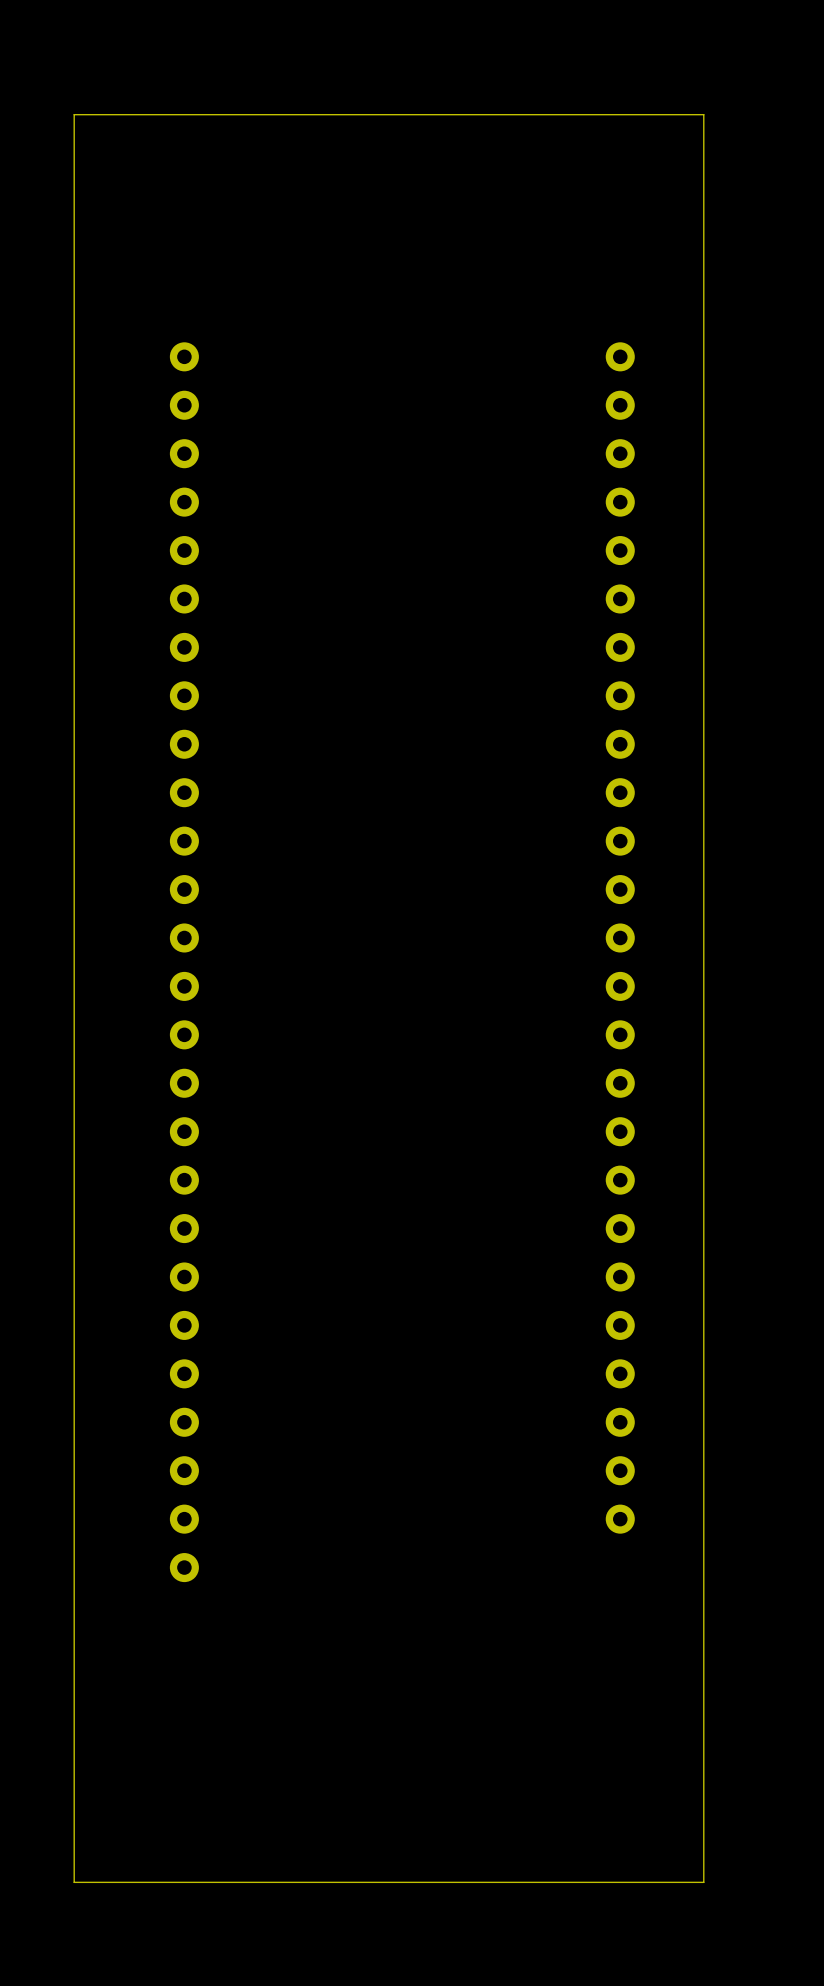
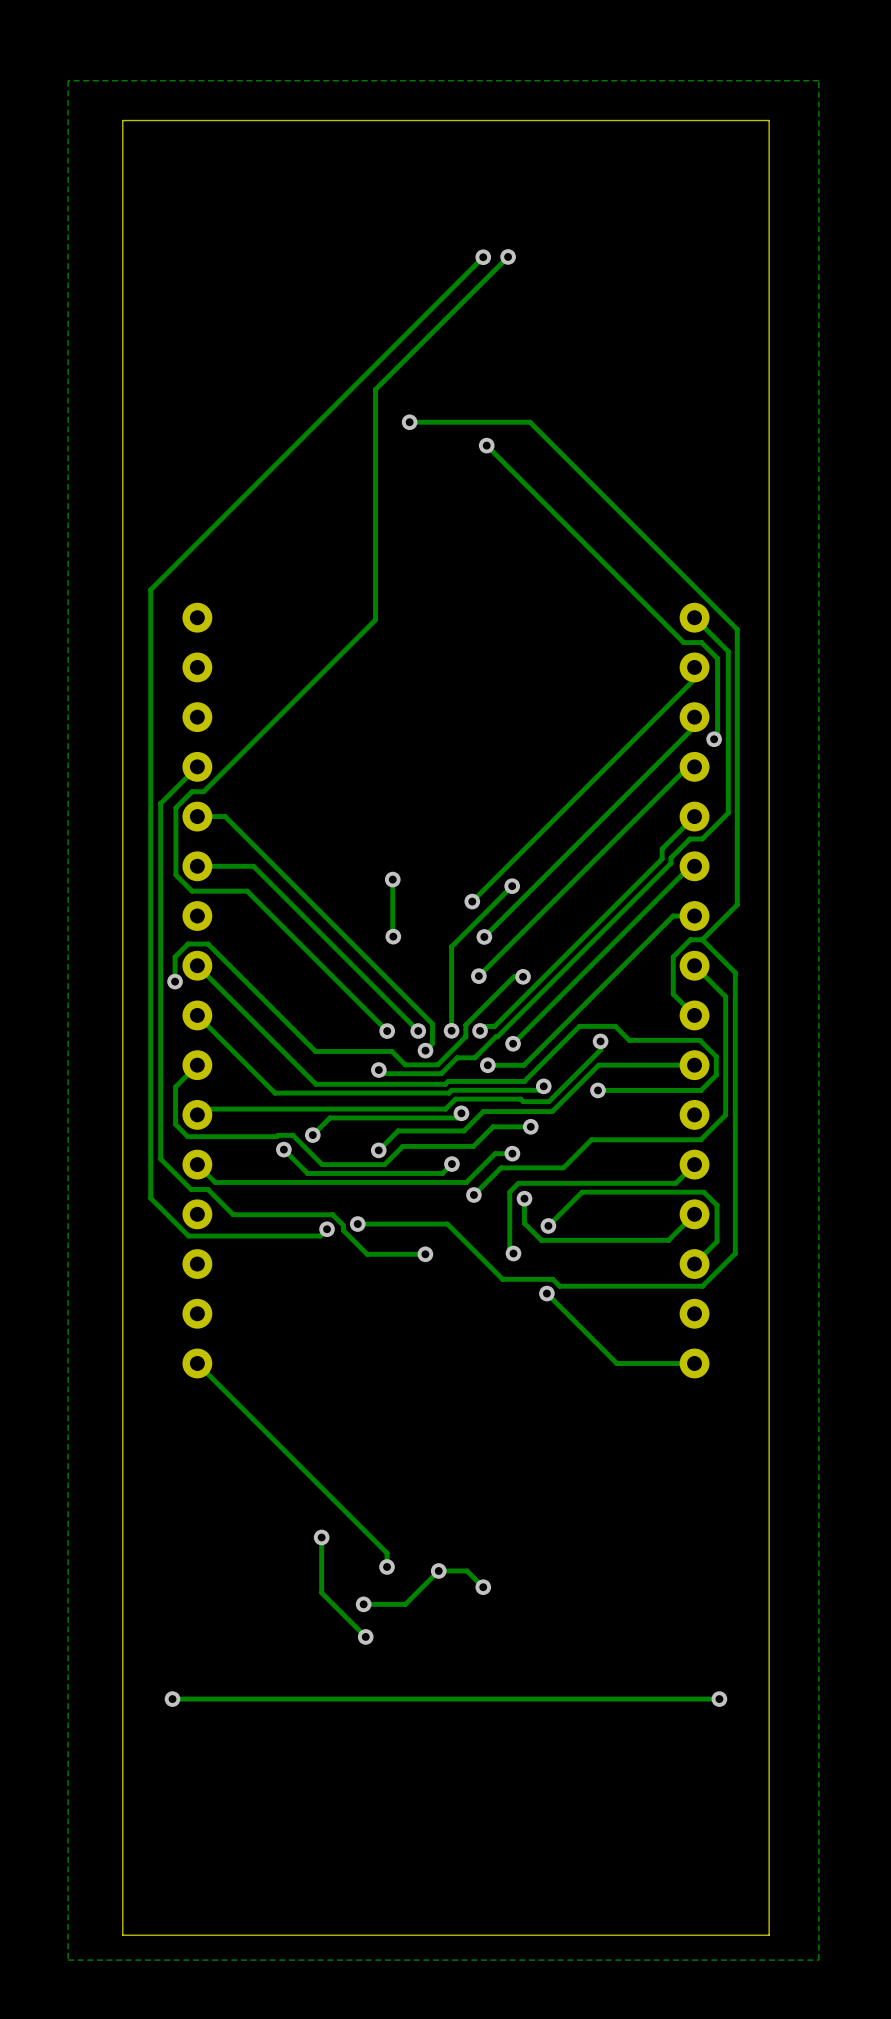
zone outline: none -> (818, 80) (818, 1960) (68, 1960) (68, 80) (818, 80)
track: none -> (483, 257) (150, 589) (150, 1198) (188, 1236) (320, 1236) (327, 1229)
via: none -> (483, 257)
track: none -> (508, 256) (375, 389) (375, 619) (203, 791) (192, 791) (175, 807) (175, 875) (192, 891) (247, 891) (387, 1031)
via: none -> (508, 256)
track: none -> (409, 422) (530, 422) (737, 629) (737, 904) (702, 939)
via: none -> (409, 422)
track: none -> (486, 445) (683, 642) (701, 642) (717, 658) (717, 735) (714, 739)
via: none -> (486, 445)
track: none -> (694, 617) (728, 651) (728, 813) (702, 839) (689, 839) (670, 857) (670, 863) (474, 1057) (457, 1057) (441, 1073) (382, 1073) (378, 1070)
track: none -> (694, 667) (694, 679) (472, 901)
track: none -> (694, 717) (694, 726) (484, 936)
via: none -> (714, 739)
track: none -> (197, 766) (160, 803) (160, 1159) (191, 1189) (207, 1189) (233, 1214) (332, 1214) (343, 1225) (343, 1230) (367, 1254) (425, 1254)
track: none -> (694, 766) (688, 766) (478, 976)
track: none -> (197, 816) (225, 816) (432, 1023) (432, 1043) (425, 1050)
track: none -> (694, 816) (662, 848) (662, 858) (494, 1026) (484, 1026) (480, 1030)
track: none -> (197, 866) (253, 866) (418, 1031)
track: none -> (694, 866) (690, 866) (513, 1043)
track: none -> (392, 879) (393, 936)
via: none -> (392, 879)
track: none -> (512, 886) (451, 946) (451, 1030)
via: none -> (512, 886)
via: none -> (472, 901)
track: none -> (694, 916) (673, 916) (523, 1065) (487, 1065)
via: none -> (393, 936)
via: none -> (484, 936)
track: none -> (702, 939) (735, 972) (735, 1253) (702, 1286) (559, 1286) (552, 1279) (502, 1279) (447, 1224) (357, 1224)
track: none -> (702, 939) (690, 939) (673, 956) (673, 994) (694, 1015)
track: none -> (197, 965) (315, 1084) (445, 1084) (448, 1081) (524, 1081) (579, 1026) (615, 1026) (629, 1040) (699, 1040) (716, 1056) (716, 1075) (701, 1090) (597, 1090)
part: (620, 937) -> none
track: none -> (694, 965) (725, 996) (725, 1114) (700, 1139) (591, 1139) (563, 1167) (501, 1167) (473, 1195)
via: none -> (478, 976)
track: none -> (523, 976) (513, 976) (465, 1024) (465, 1036) (437, 1064) (405, 1064) (391, 1051) (315, 1051) (208, 944) (188, 944) (175, 957) (175, 981)
via: none -> (523, 976)
via: none -> (175, 981)
part: none -> (197, 990)
part: (184, 962) -> none
part: none -> (694, 990)
track: none -> (197, 1015) (275, 1093) (449, 1093) (451, 1090) (539, 1090) (543, 1086)
via: none -> (387, 1031)
via: none -> (418, 1031)
via: none -> (451, 1030)
via: none -> (480, 1030)
track: none -> (600, 1041) (600, 1049) (548, 1101) (523, 1101) (520, 1099) (455, 1099) (445, 1109) (203, 1109) (197, 1114)
via: none -> (600, 1041)
via: none -> (513, 1043)
via: none -> (425, 1050)
track: none -> (197, 1065) (175, 1086) (175, 1124) (187, 1136) (292, 1135) (322, 1164) (384, 1164) (402, 1146) (473, 1146) (493, 1126) (530, 1126)
via: none -> (487, 1065)
track: none -> (694, 1065) (598, 1065) (552, 1111) (483, 1111) (464, 1130) (398, 1130) (378, 1150)
via: none -> (378, 1070)
via: none -> (543, 1086)
via: none -> (597, 1090)
track: none -> (461, 1113) (456, 1117) (329, 1117) (312, 1135)
via: none -> (461, 1113)
via: none -> (530, 1126)
via: none -> (312, 1135)
track: none -> (283, 1149) (307, 1173) (442, 1173) (451, 1164)
via: none -> (283, 1149)
via: none -> (378, 1150)
track: none -> (512, 1153) (495, 1153) (466, 1182) (215, 1182) (197, 1164)
via: none -> (512, 1153)
via: none -> (451, 1164)
track: none -> (694, 1164) (675, 1183) (518, 1183) (509, 1192) (509, 1249) (513, 1253)
via: none -> (473, 1195)
track: none -> (524, 1198) (524, 1223) (541, 1240) (668, 1240) (694, 1214)
via: none -> (524, 1198)
via: none -> (357, 1224)
track: none -> (548, 1225) (582, 1192) (703, 1192) (717, 1205) (717, 1241) (694, 1264)
via: none -> (548, 1225)
via: none -> (327, 1229)
via: none -> (513, 1253)
via: none -> (425, 1254)
track: none -> (546, 1293) (616, 1363) (694, 1363)
via: none -> (546, 1293)
track: none -> (197, 1363) (387, 1553) (387, 1566)
track: none -> (321, 1537) (321, 1592) (365, 1636)
via: none -> (321, 1537)
via: none -> (387, 1566)
via: none -> (438, 1571)
track: none -> (483, 1587) (467, 1571) (438, 1571) (405, 1604) (363, 1604)
via: none -> (483, 1587)
via: none -> (363, 1604)
via: none -> (365, 1636)
via: none -> (172, 1699)
track: none -> (719, 1699) (172, 1699)
via: none -> (719, 1699)

